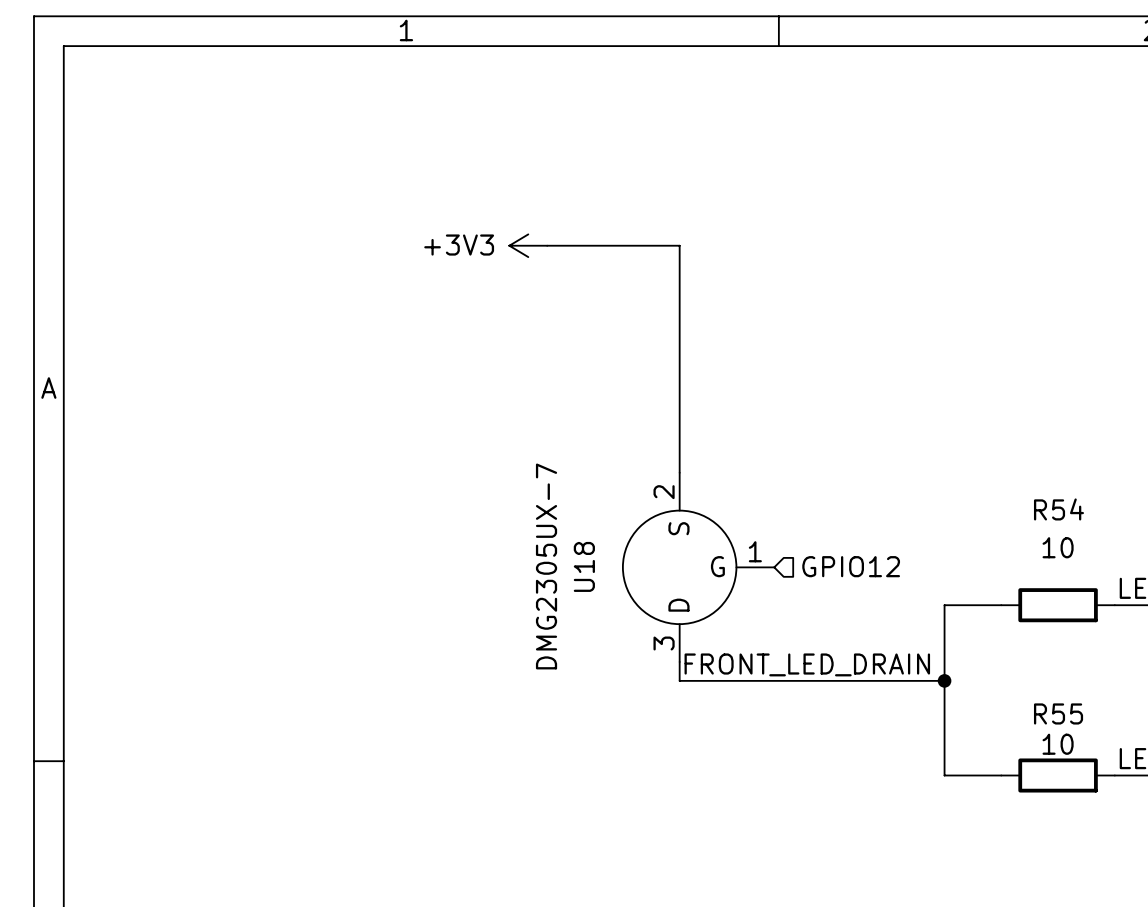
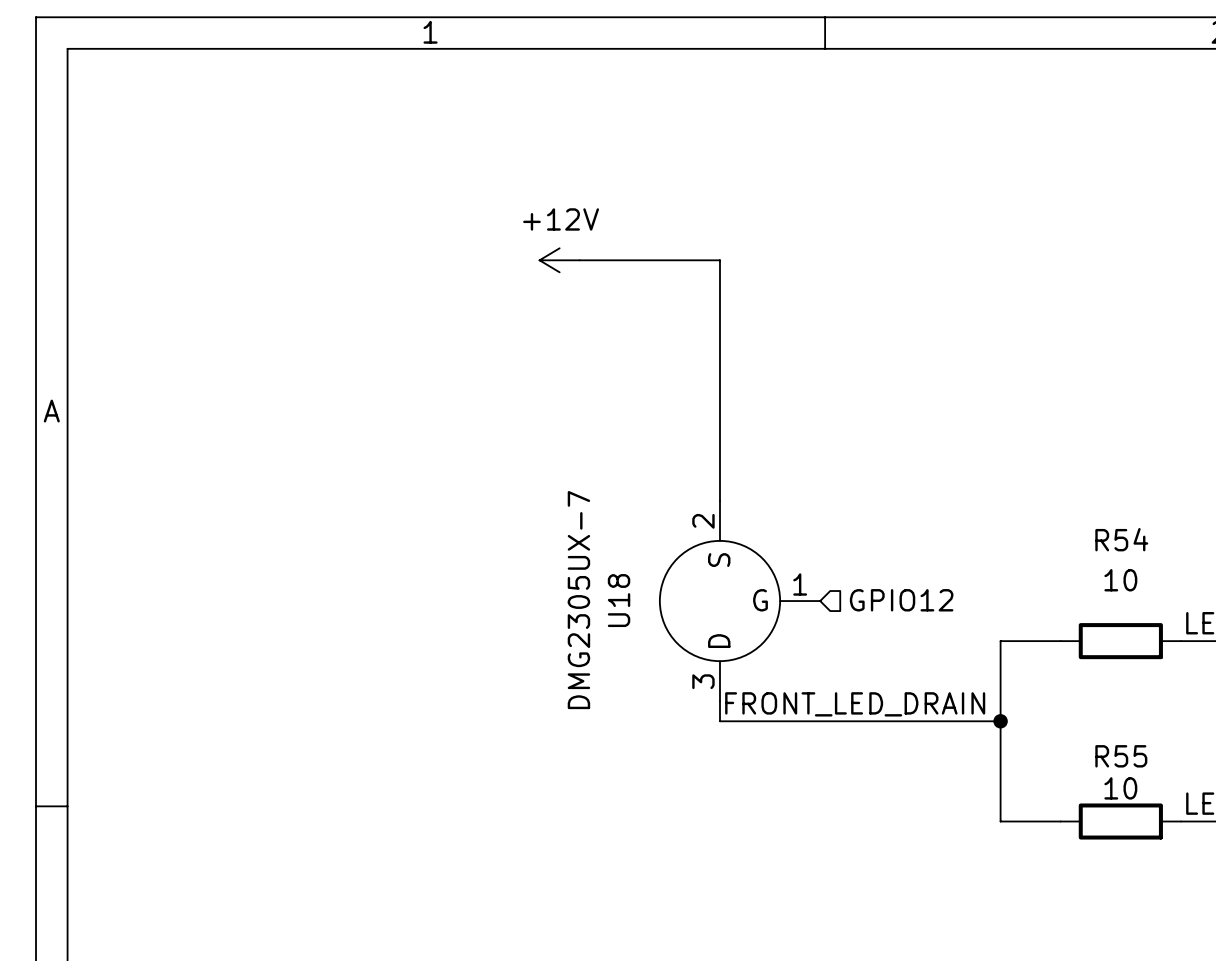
power symbol: +3V3 (528, 245) -> +12V (559, 260)

